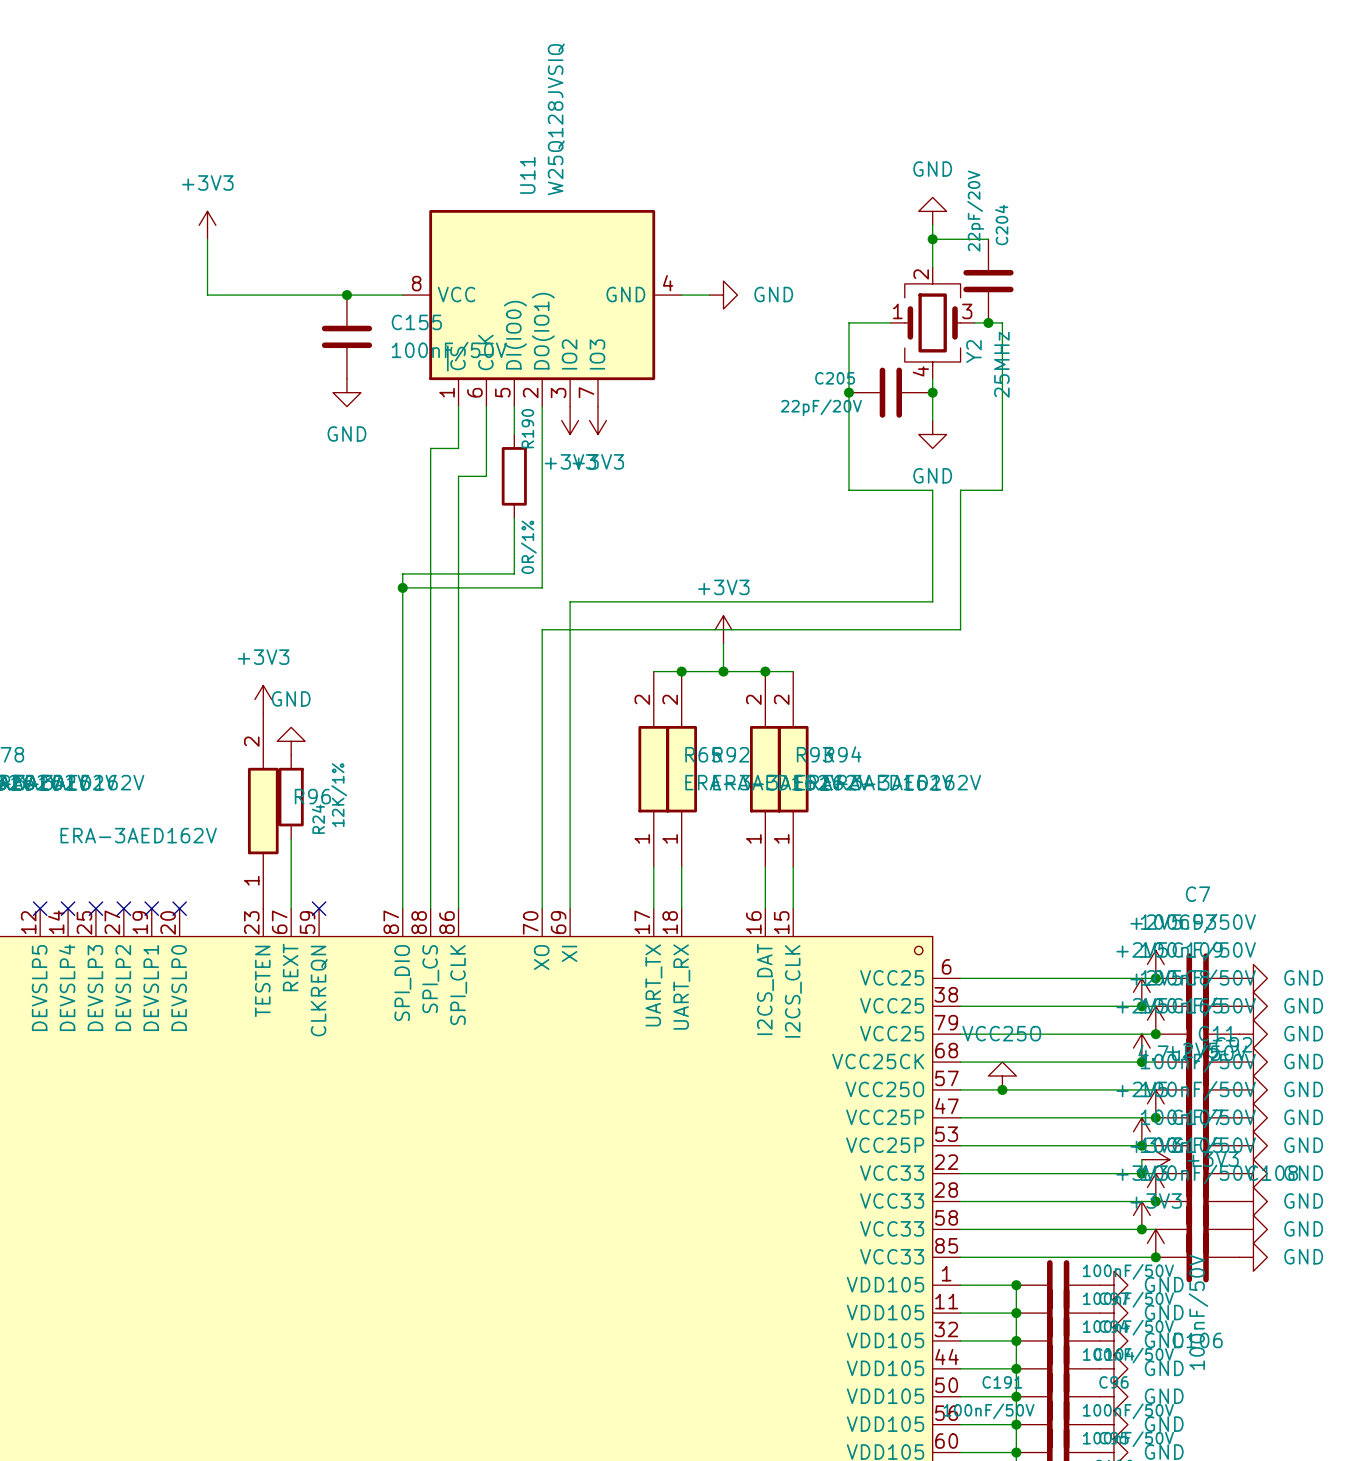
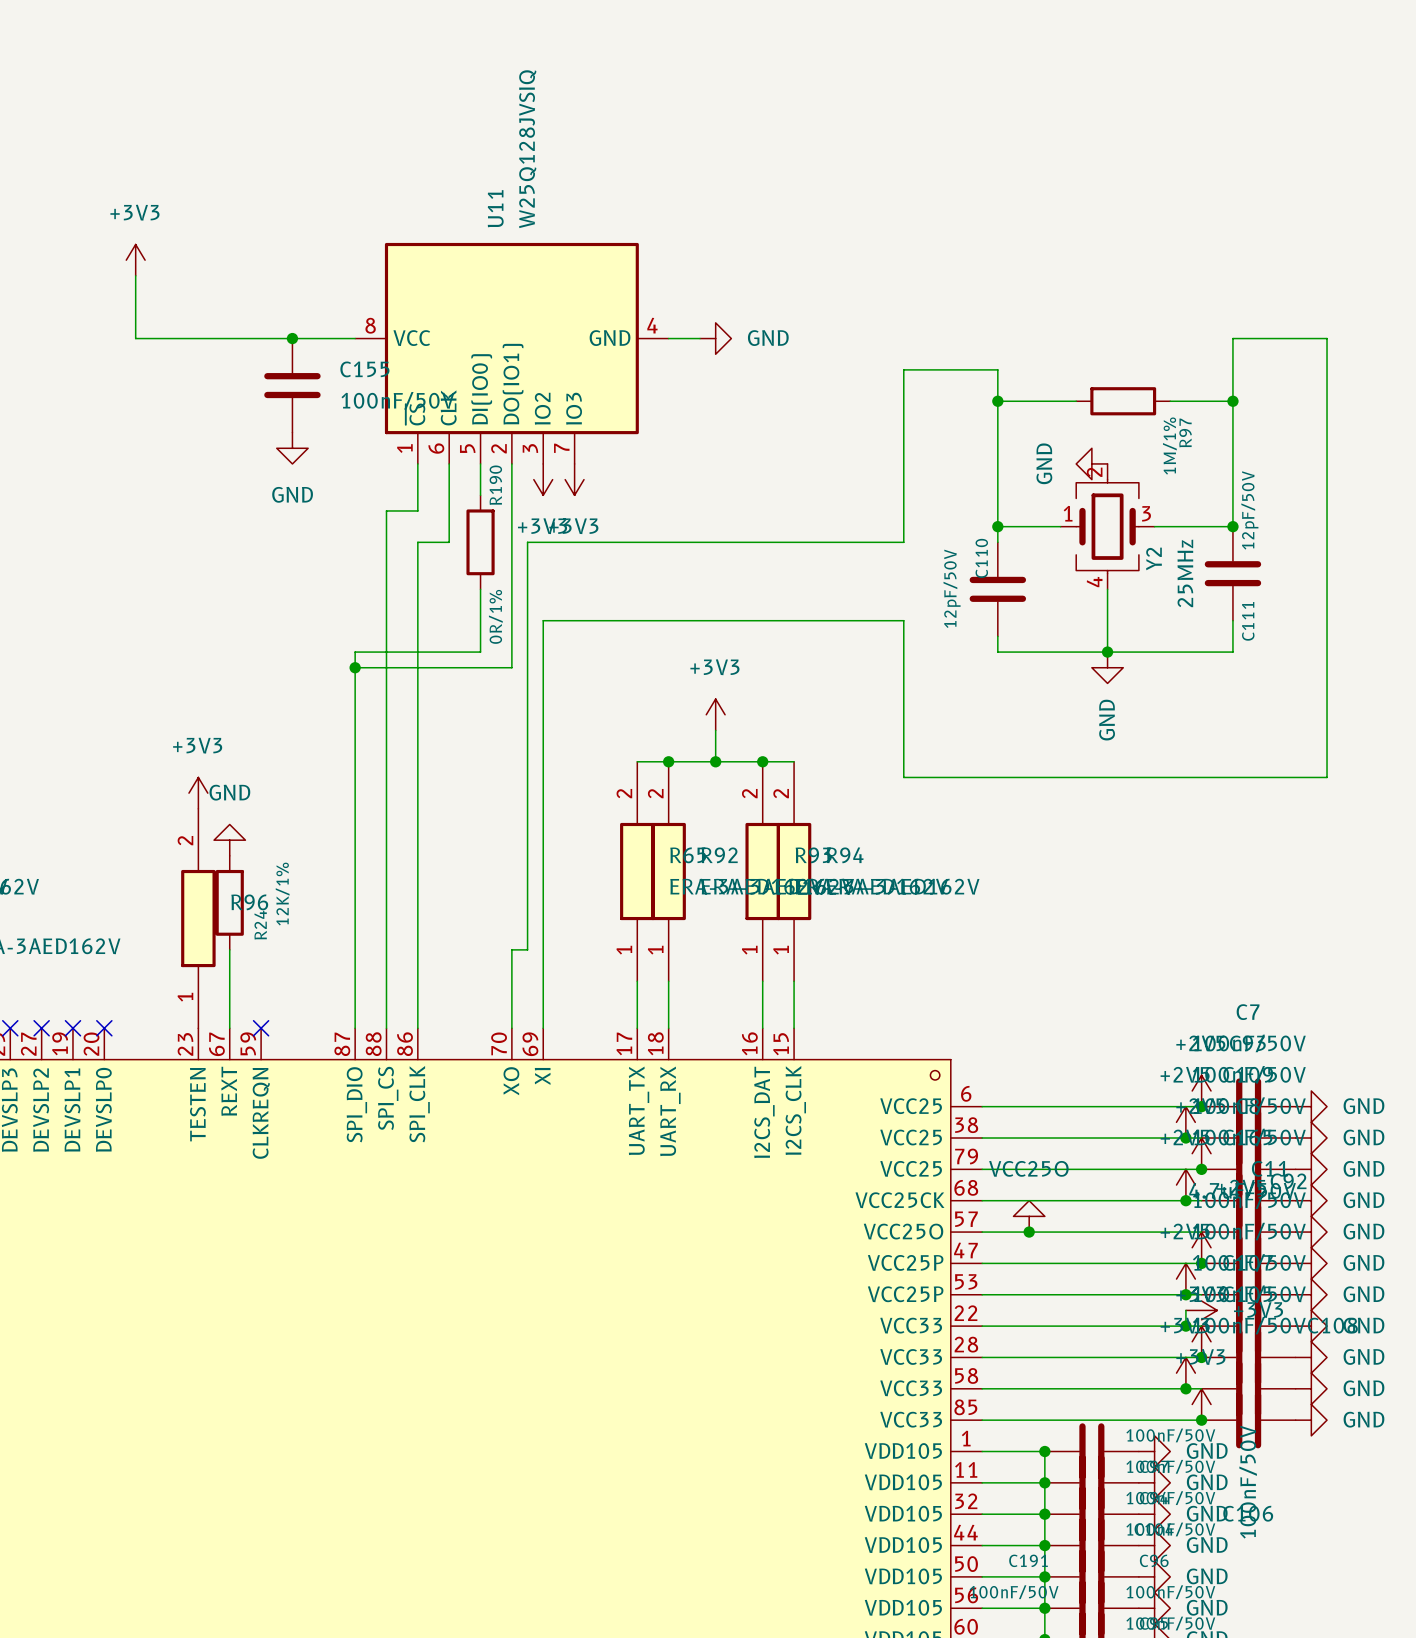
power symbol: GND (932, 211) -> none
wire: (932, 225) (932, 267) -> none
wire: (932, 239) (988, 239) -> (1170, 401) (1232, 401)
junction: (932, 239) -> none
C204: 22pF/20V (988, 281) -> none
wire: (890, 322) (849, 322) (849, 490) (932, 490) (932, 601) (570, 601) -> (1154, 526) (1232, 526) (1232, 338) (1327, 338) (1327, 777) (903, 777) (903, 620) (543, 620) (543, 683)
Y2 position: (932, 322) -> (1107, 526)
wire: (974, 322) (1002, 322) (1002, 490) (960, 490) (960, 629) (542, 629) (542, 838) -> (997, 542) (997, 369) (903, 369) (903, 542) (527, 542) (527, 949) (511, 949)
junction: (988, 322) -> none
wire: none -> (997, 401) (1076, 401)
junction: none -> (997, 401)
R97: none -> 1M/1% (1123, 401)
junction: none -> (1232, 401)
wire: (932, 378) (932, 420) -> none
junction: (849, 392) -> none
C205: 22pF/20V (890, 392) -> none
junction: (932, 392) -> none
power symbol: none -> GND (1091, 463)
power symbol: GND (932, 434) -> none
wire: none -> (997, 526) (1060, 526)
junction: none -> (997, 526)
junction: none -> (1232, 526)
C111: none -> 12pF/50V (1232, 573)
C110: none -> 12pF/50V (997, 589)
wire: none -> (1107, 589) (1107, 652)
wire: none -> (1232, 620) (1232, 652) (997, 652) (997, 636)
junction: none -> (1107, 652)
power symbol: none -> GND (1107, 667)

